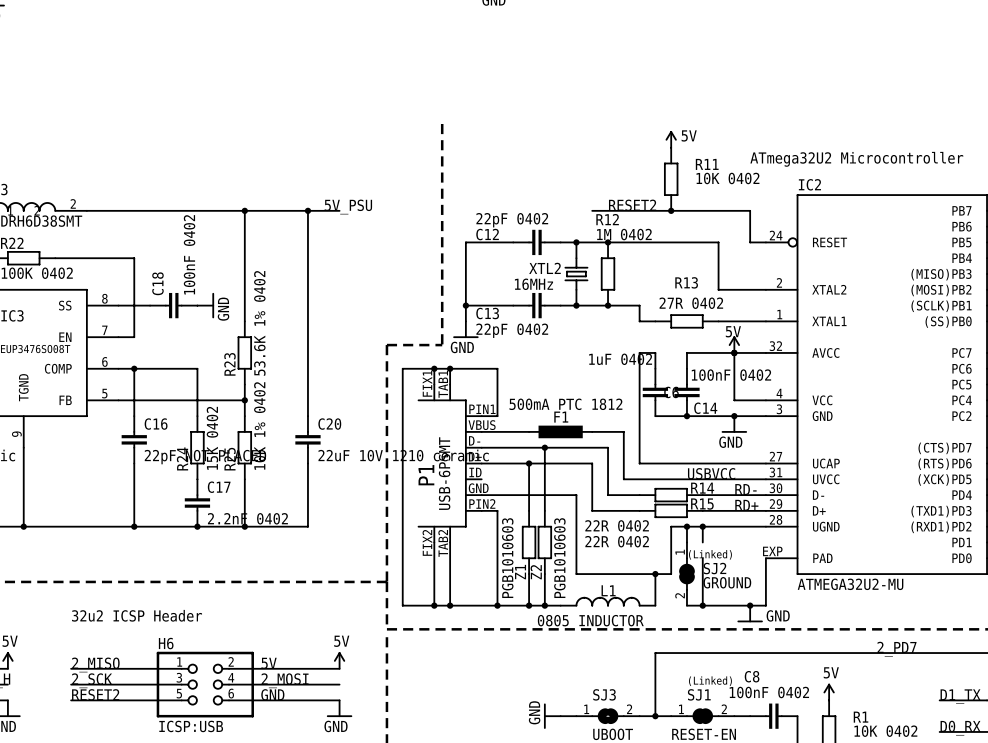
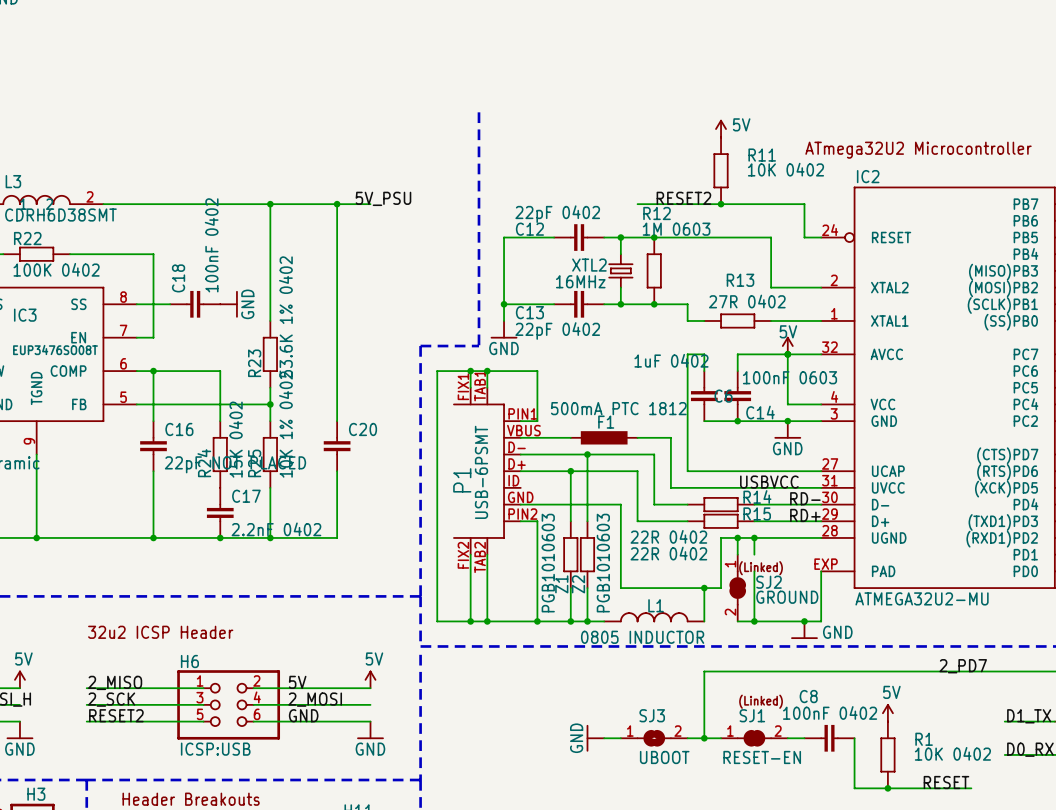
R12 value: 1M 0402 (624, 234) -> 1M 0603 (676, 229)
C14 value: 100nF 0402 (731, 375) -> 100nF 0603 (789, 377)
C20 value: 22uF 10V 1210 ceramic (403, 455) -> none

